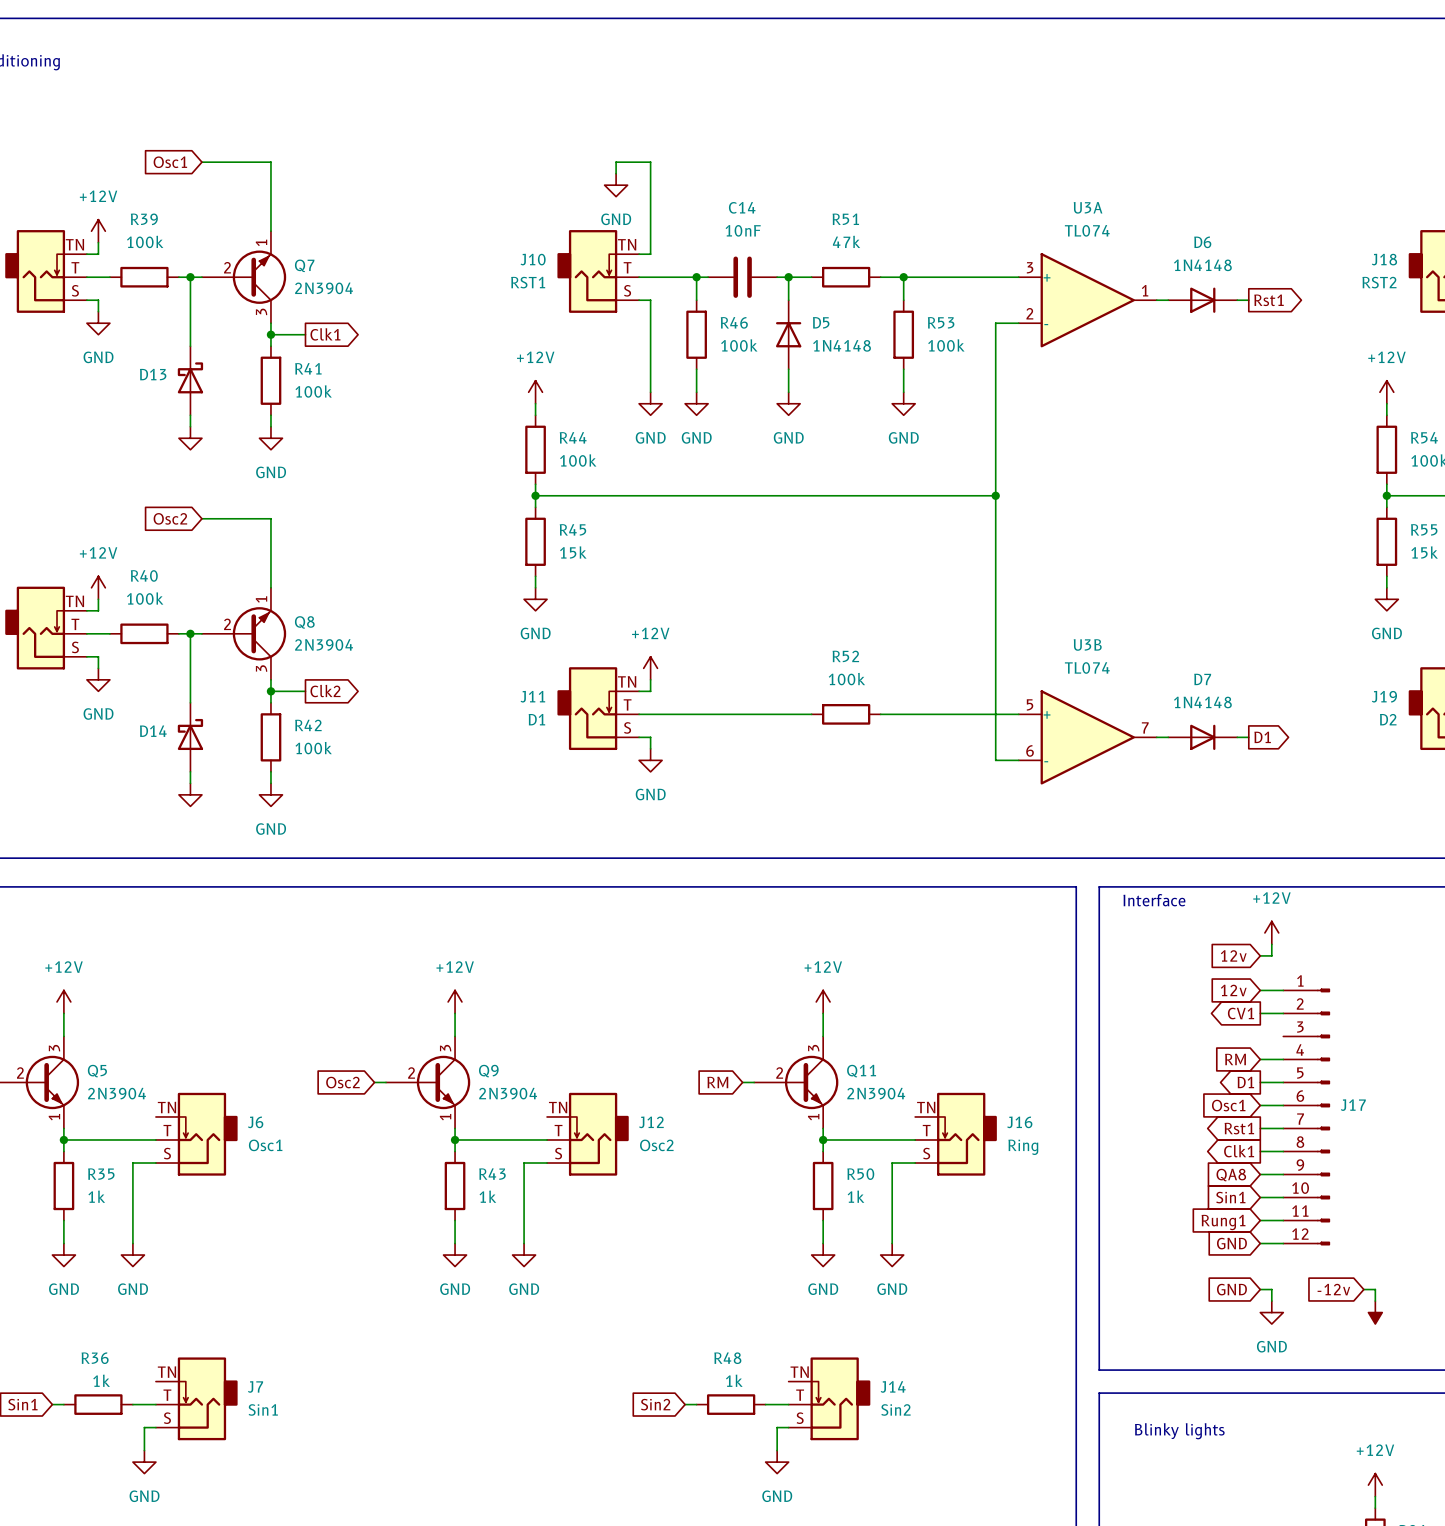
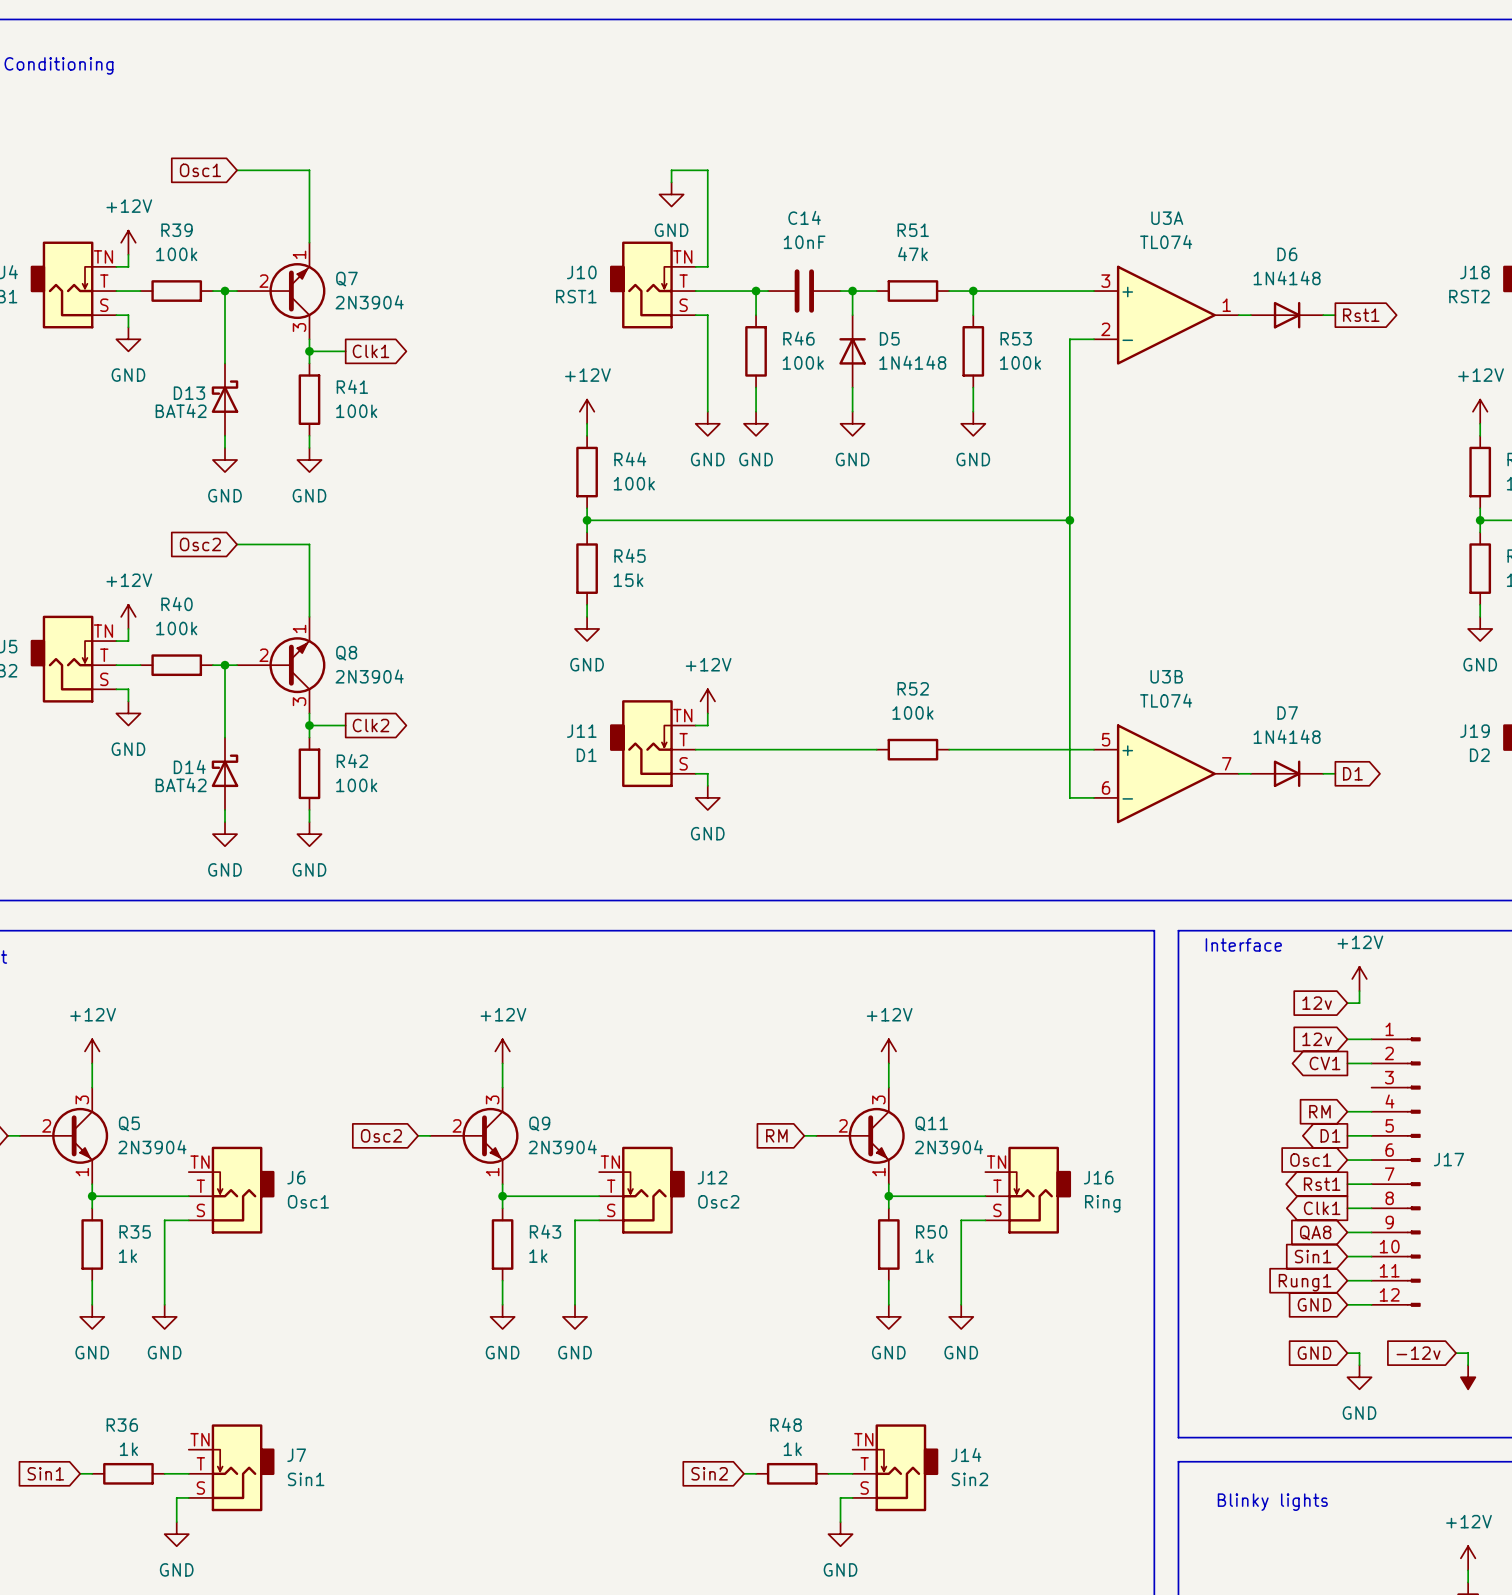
D13 value: none -> BAT42 (181, 410)
power symbol text: none -> GND (224, 495)
D14 value: none -> BAT42 (181, 785)
power symbol text: none -> GND (224, 869)

